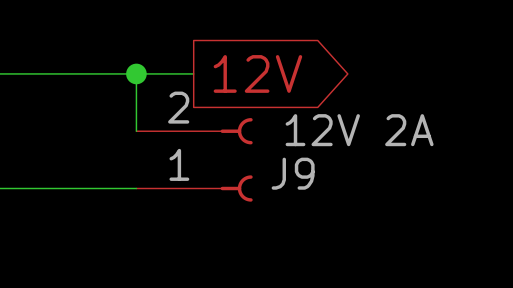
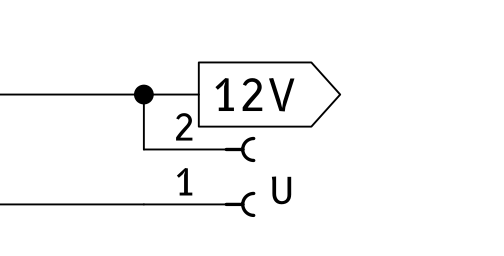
J9 value: 12V 2A (359, 130) -> none
J9 name: J9 (293, 173) -> U (281, 190)

